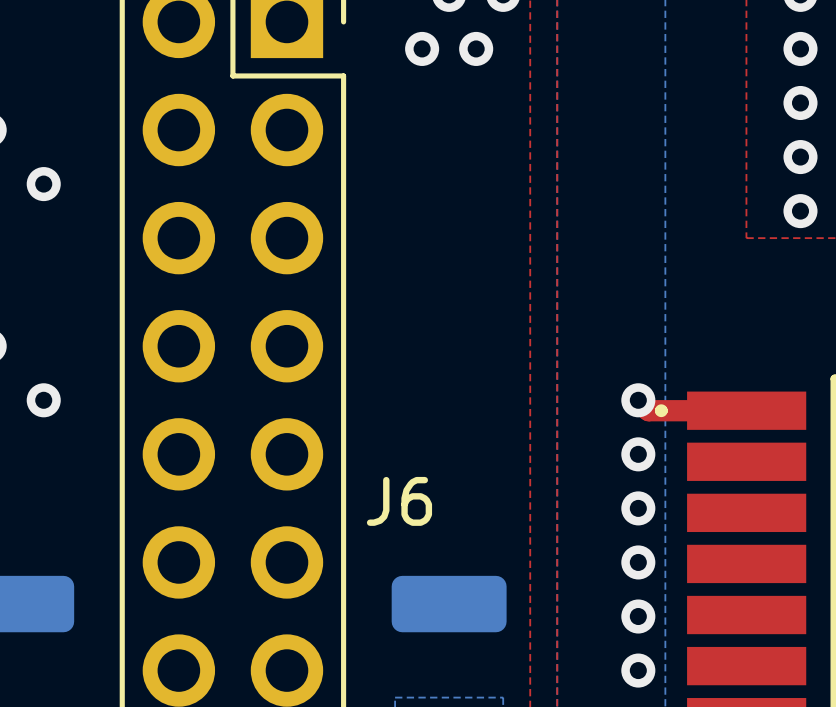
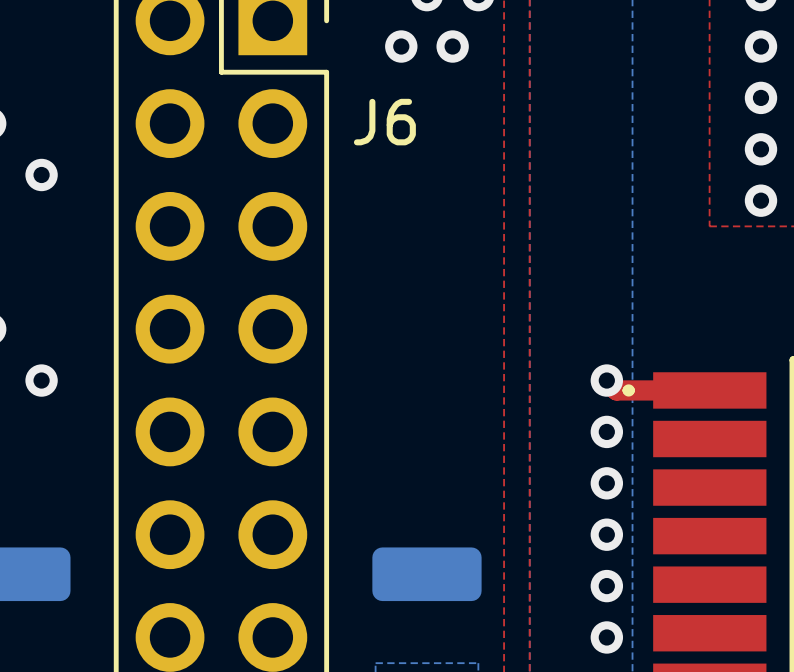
J6 name position: J6 (399, 501) -> J6 (384, 122)

